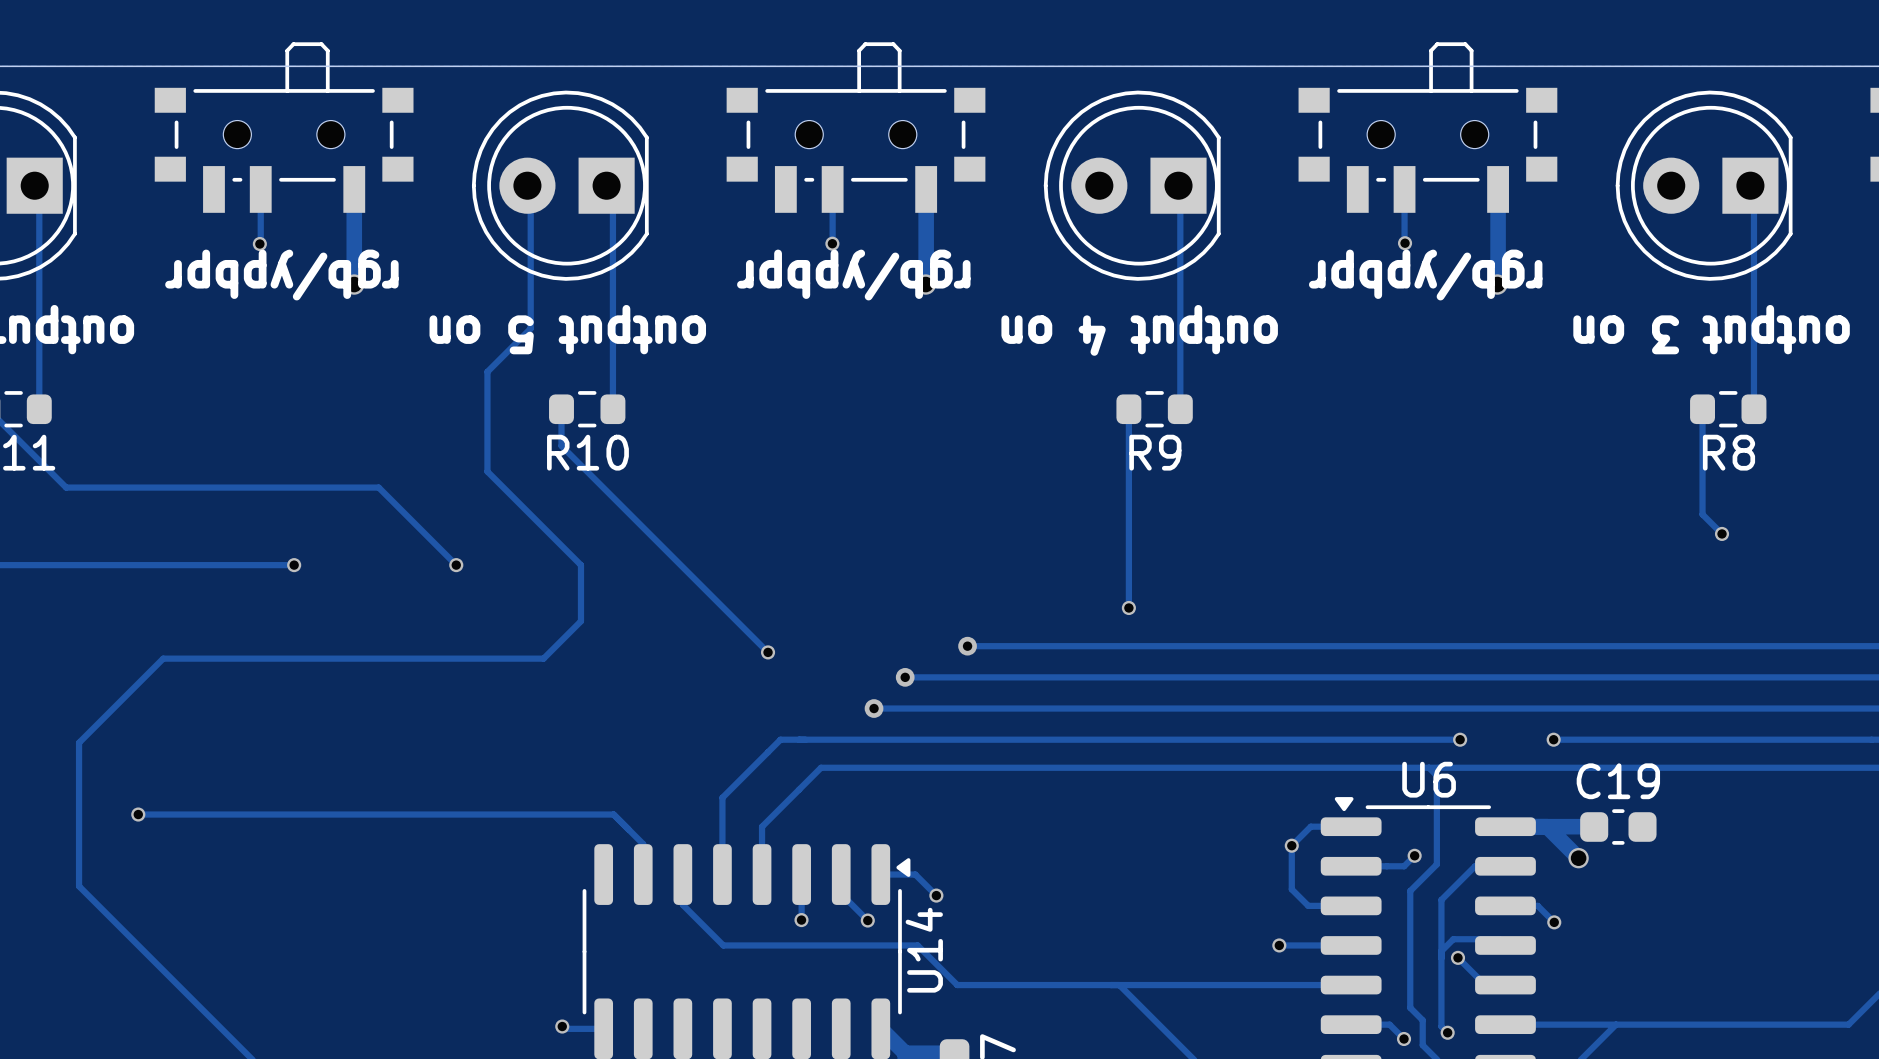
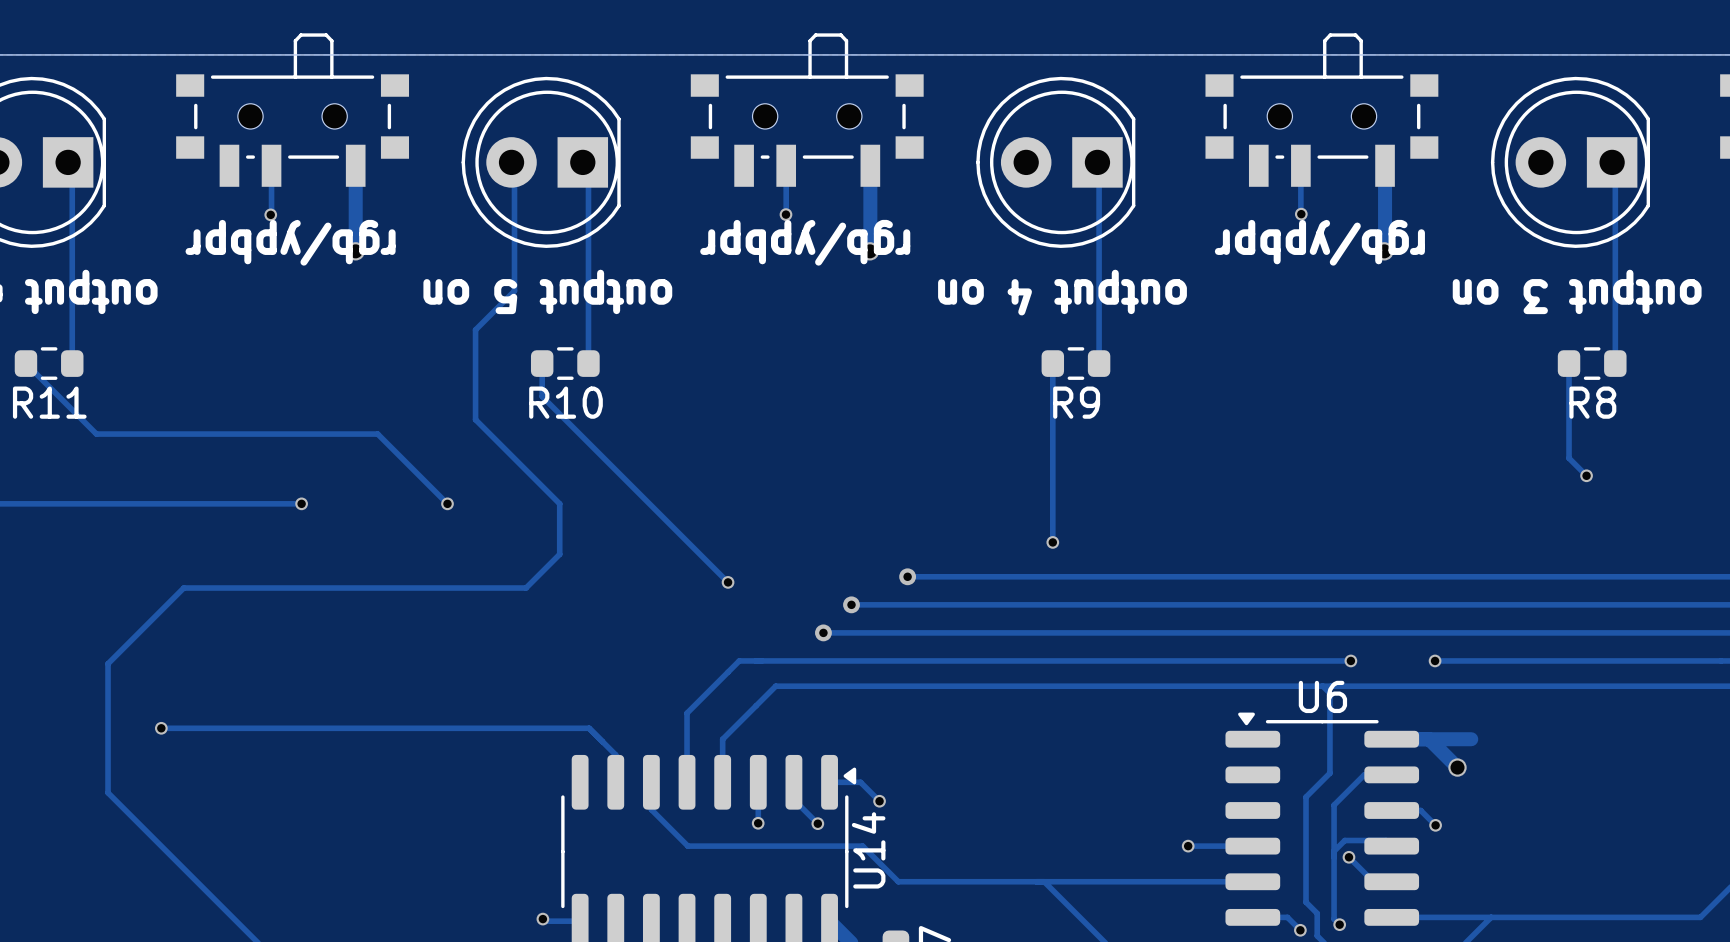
track: (1351, 826) (1310, 826) (1291, 845) (1291, 889) (1308, 905) (1351, 905) -> none
C19: (1618, 827) -> none
via: (1291, 845) -> none
track: (1414, 855) (1404, 866) (1351, 866) -> none
via: (1414, 855) -> none

